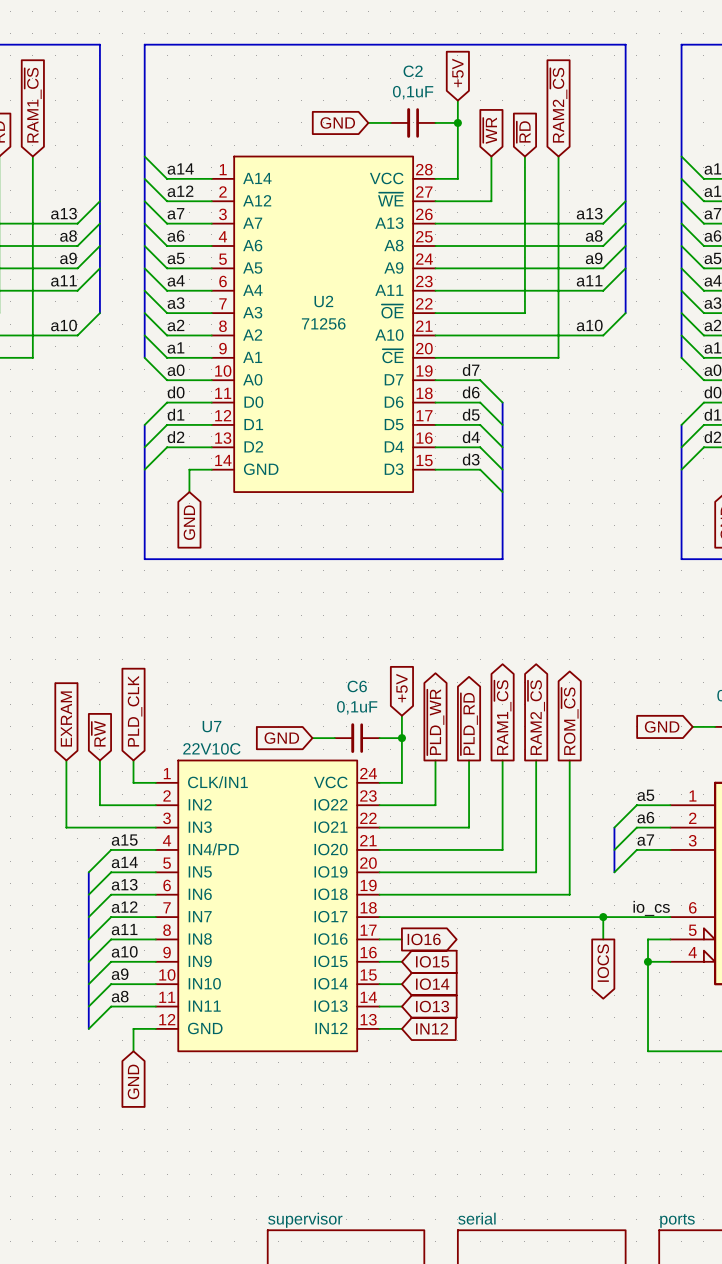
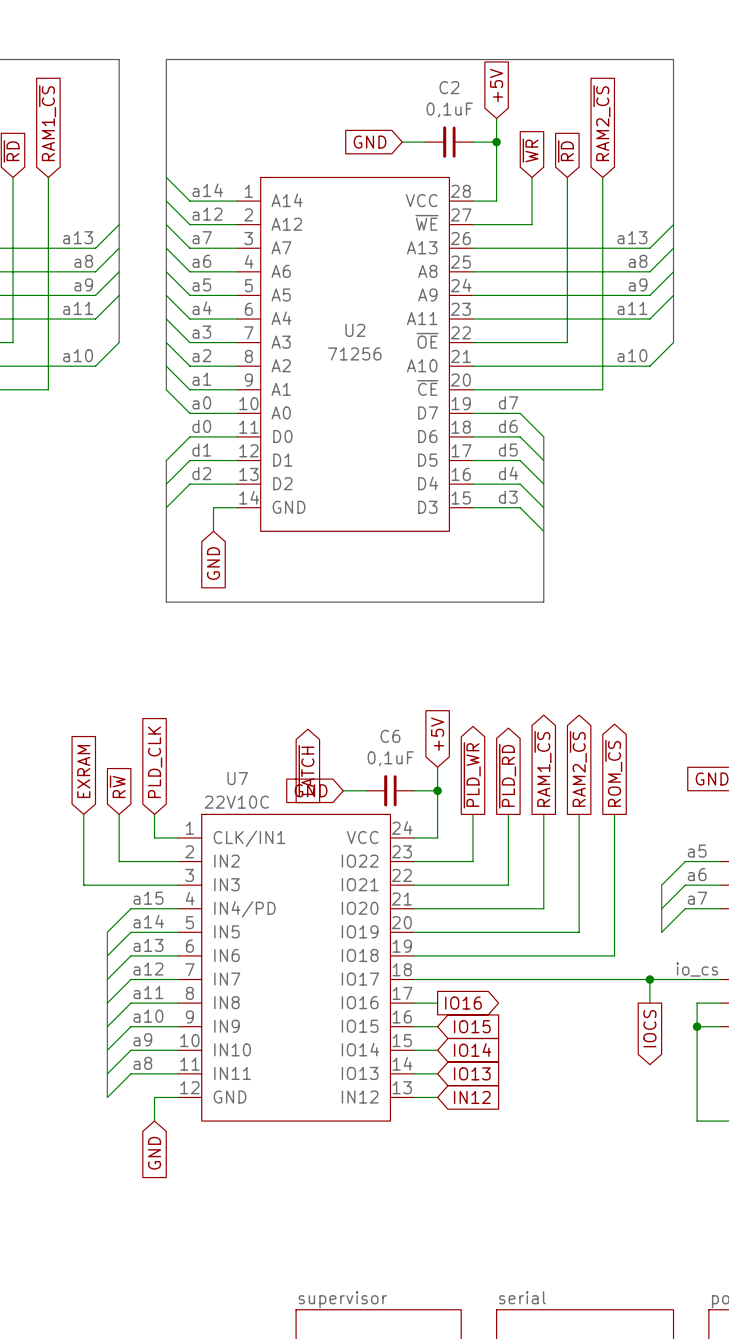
global label: none -> ~{LATCH} (306, 770)

